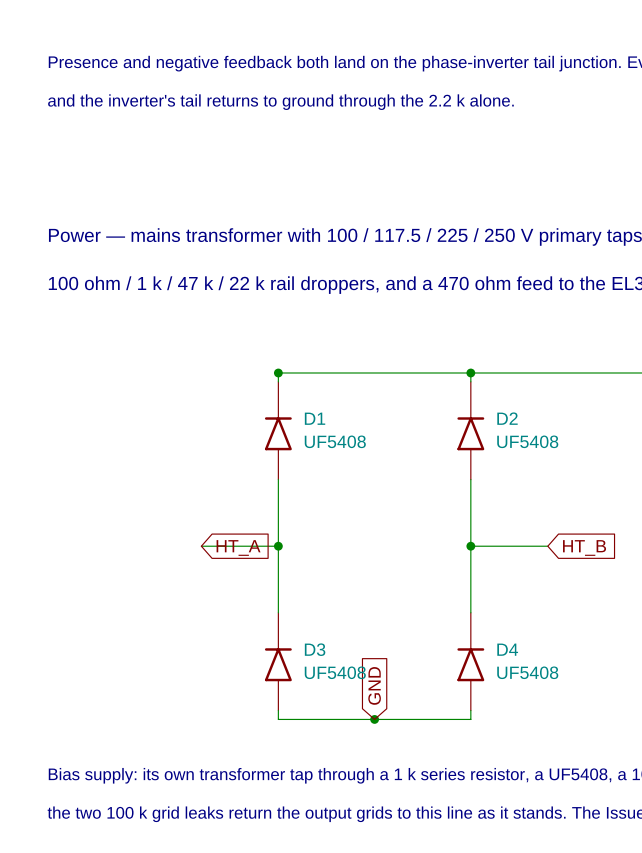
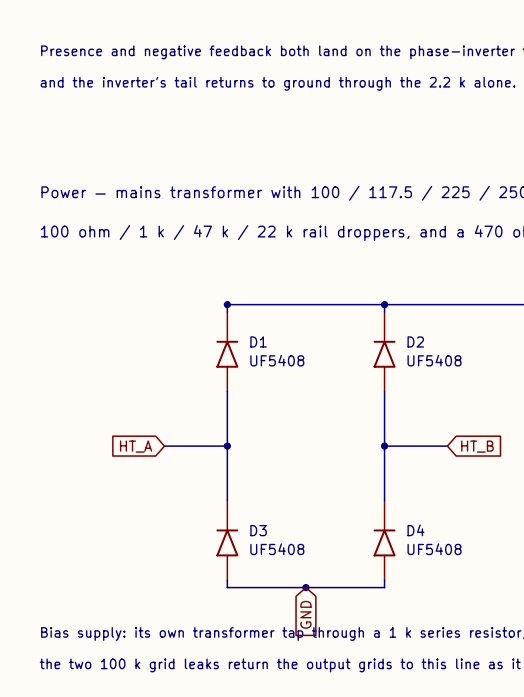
global label rotation: 0° (238, 547) -> 180° (136, 446)
global label rotation: 0° (374, 685) -> 180° (305, 614)

